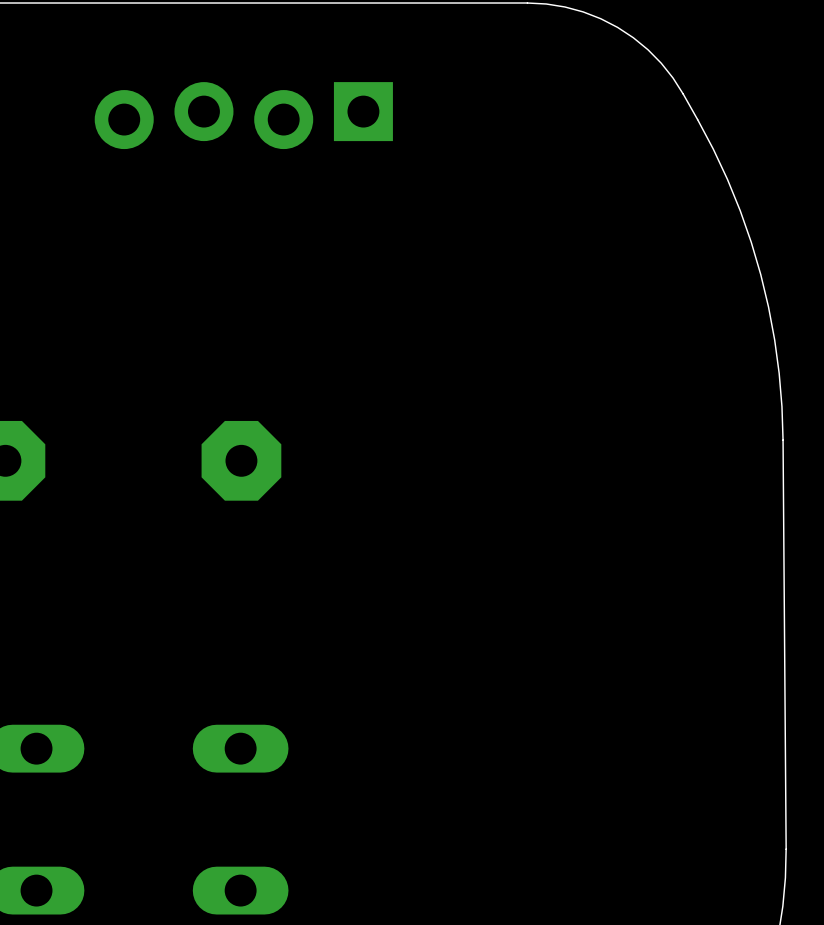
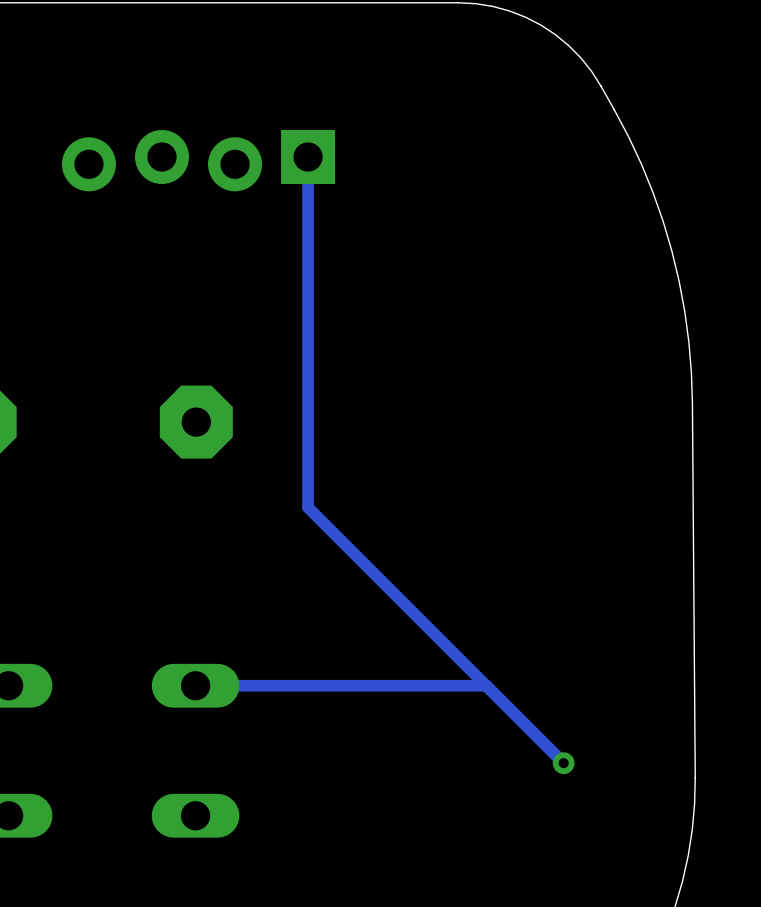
part position: (243, 115) -> (198, 160)
track: none -> (308, 156) (308, 507) (563, 763)
track: none -> (486, 685) (195, 685)
via: none -> (563, 763)

